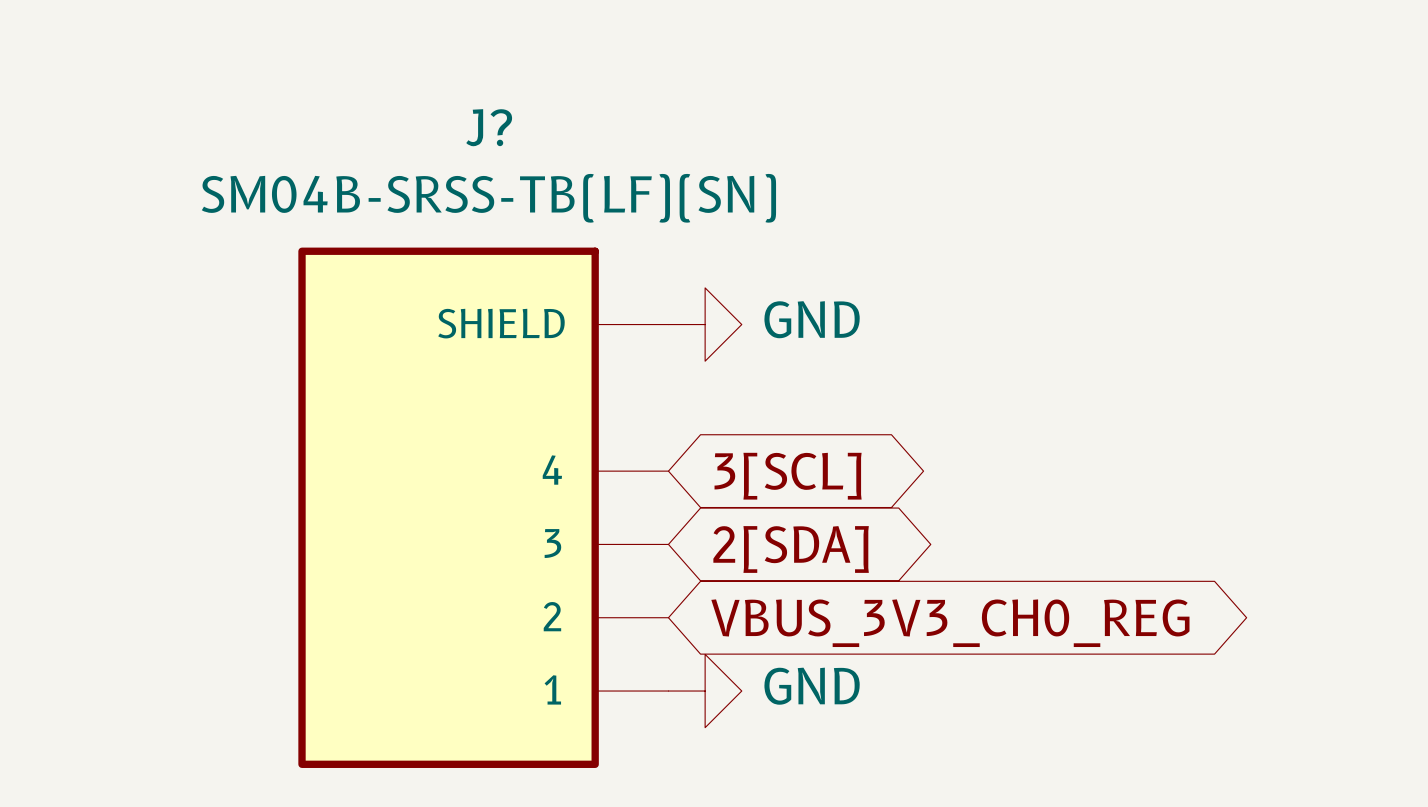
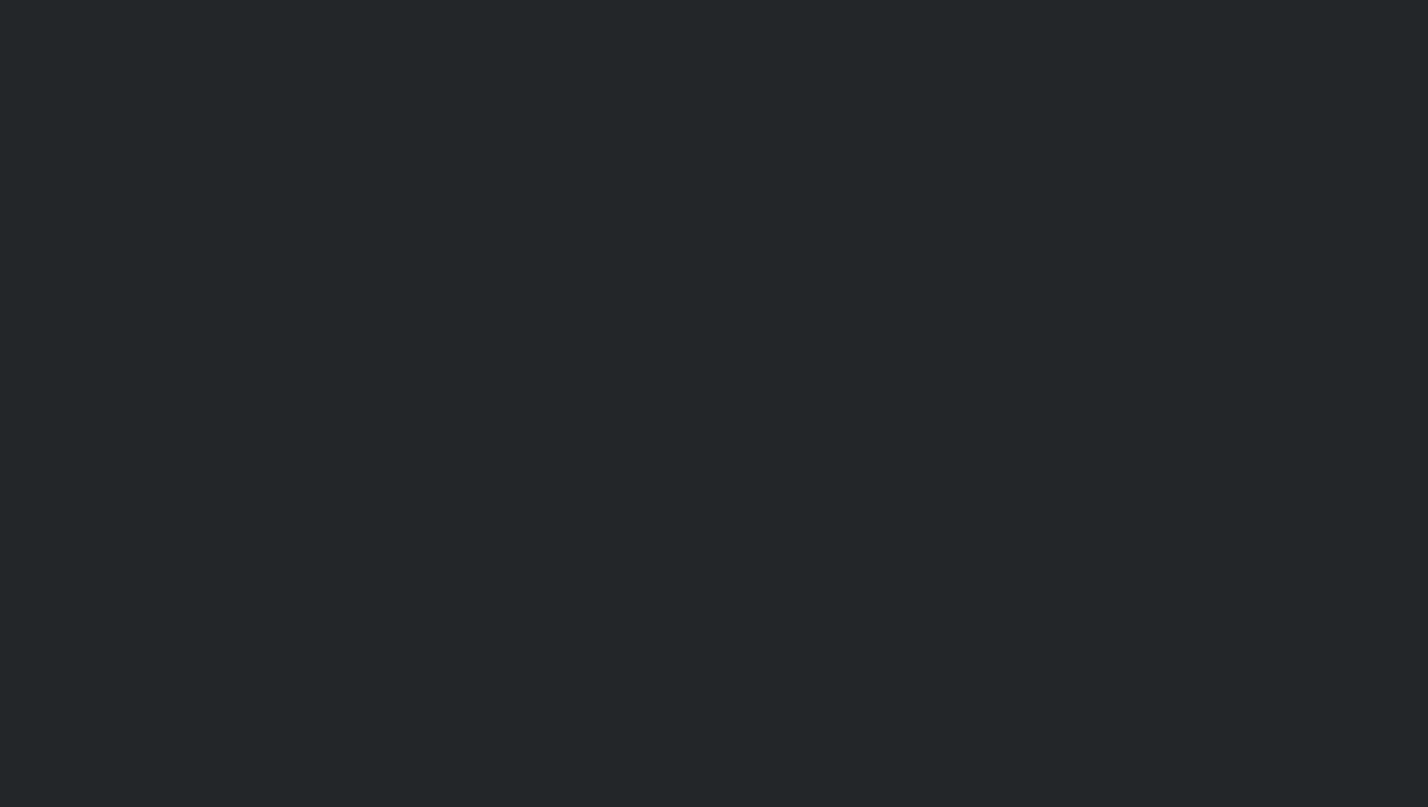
power symbol: GND (705, 324) -> none
global label: 3[SCL] (788, 476) -> none
J?: SM04B-SRSS-TB(LF)(SN) (483, 507) -> none
global label: 2[SDA] (791, 549) -> none
global label: VBUS_3V3_CH0_REG (950, 623) -> none
power symbol: GND (705, 691) -> none

